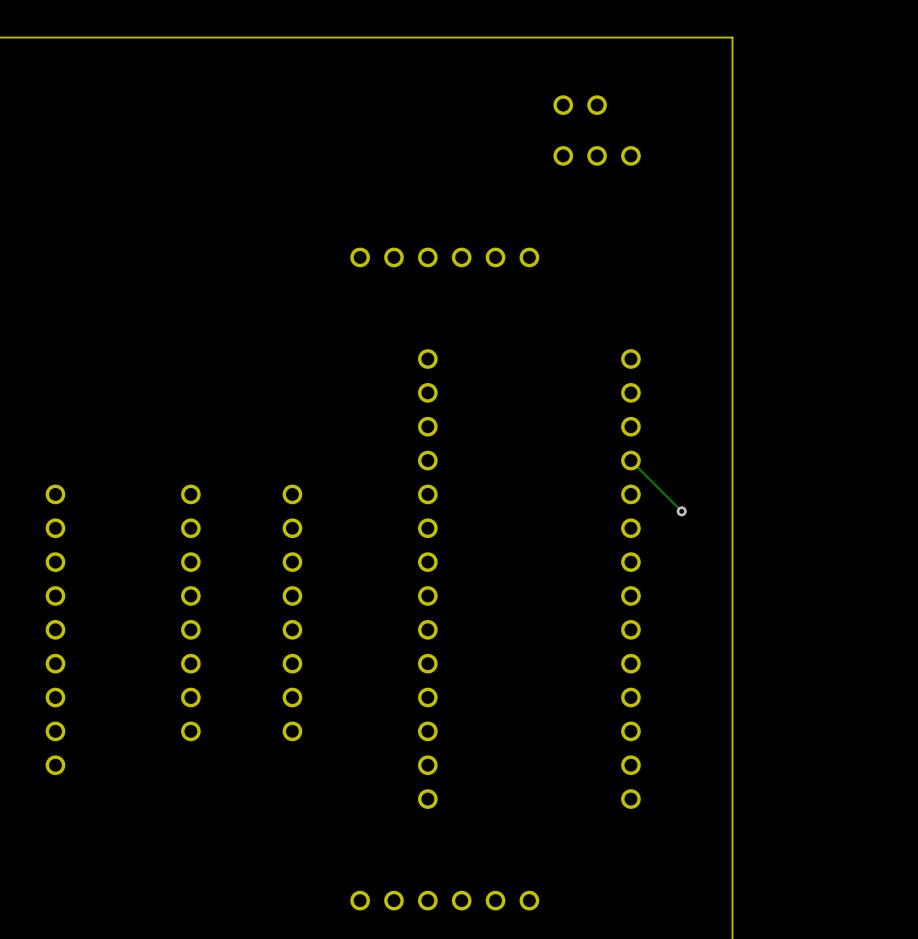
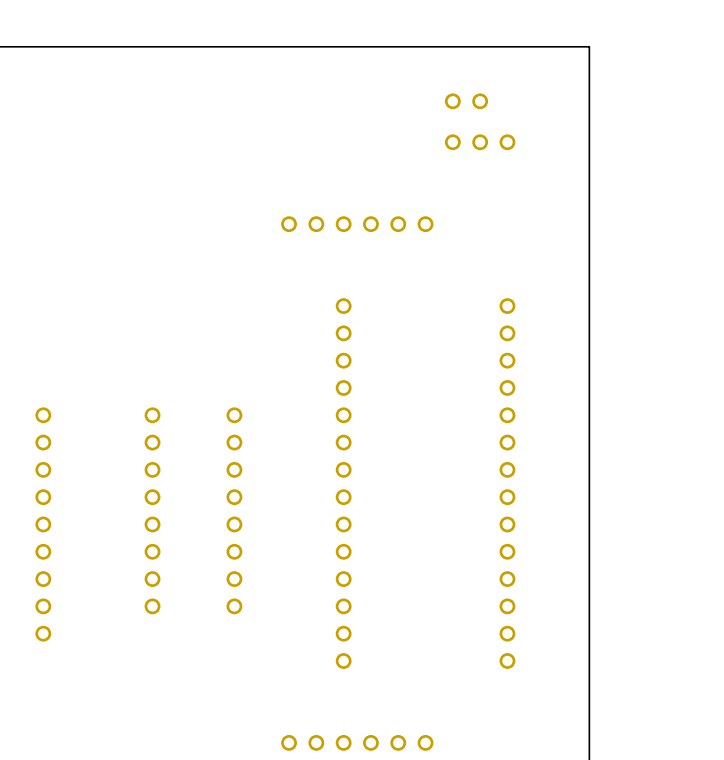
track: (630, 460) (681, 511) -> none
via: (681, 511) -> none

